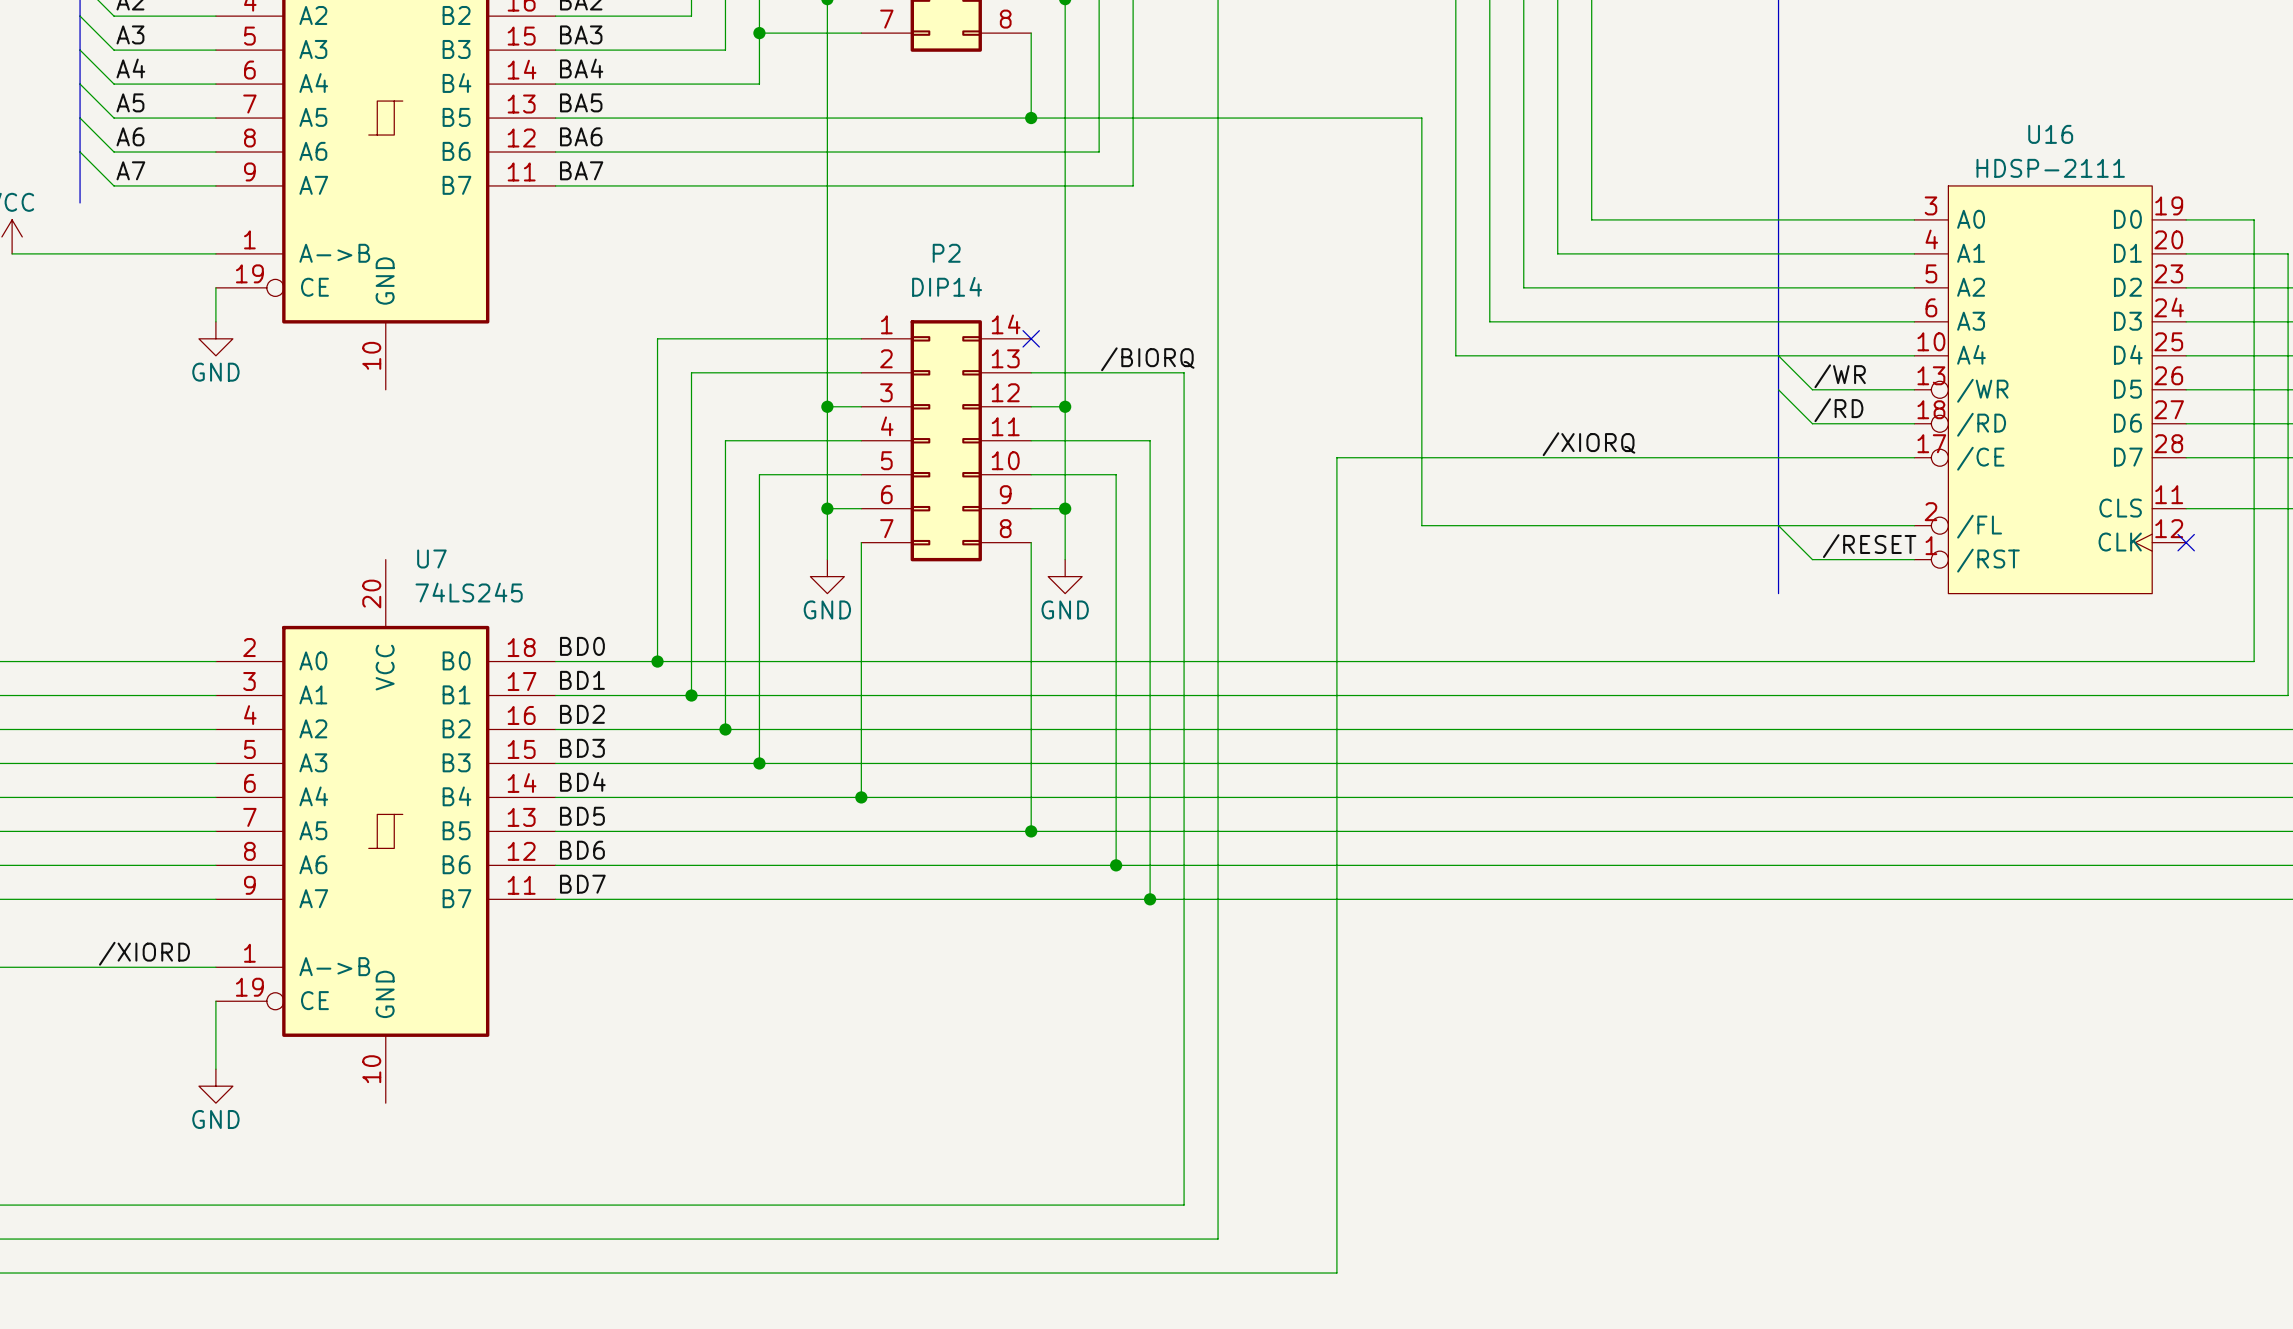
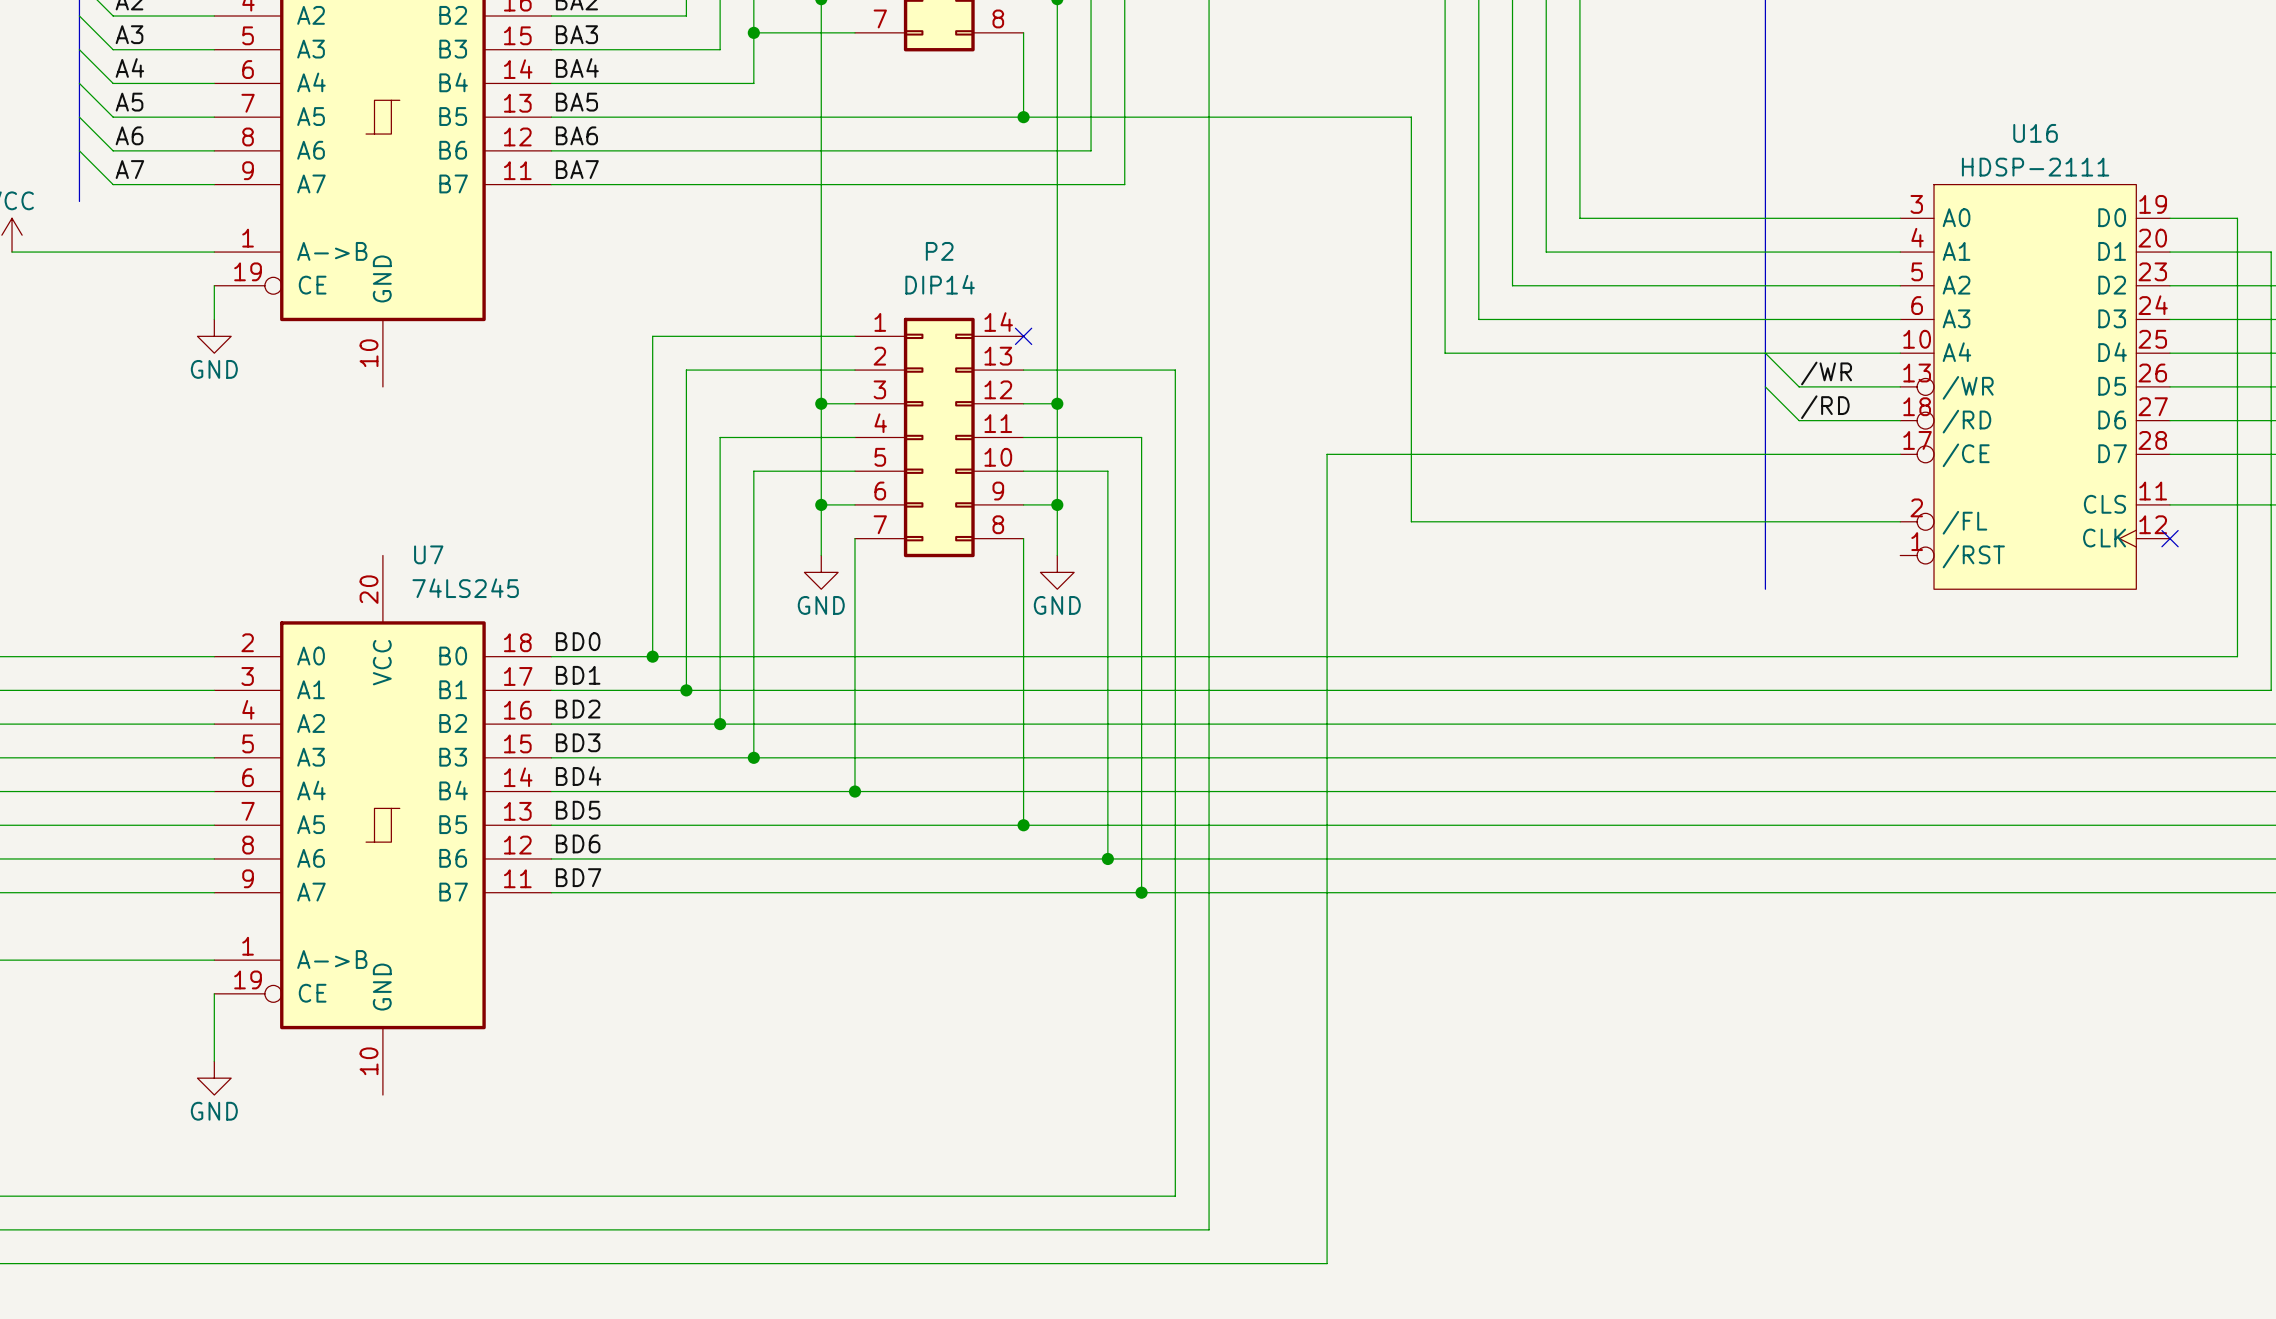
label: /BIORQ (1147, 359) -> none
label: /XIORQ (1588, 444) -> none
wire: (1778, 525) (1812, 559) (1914, 559) -> none
label: /RESET (1869, 546) -> none
label: /XIORD (144, 953) -> none

